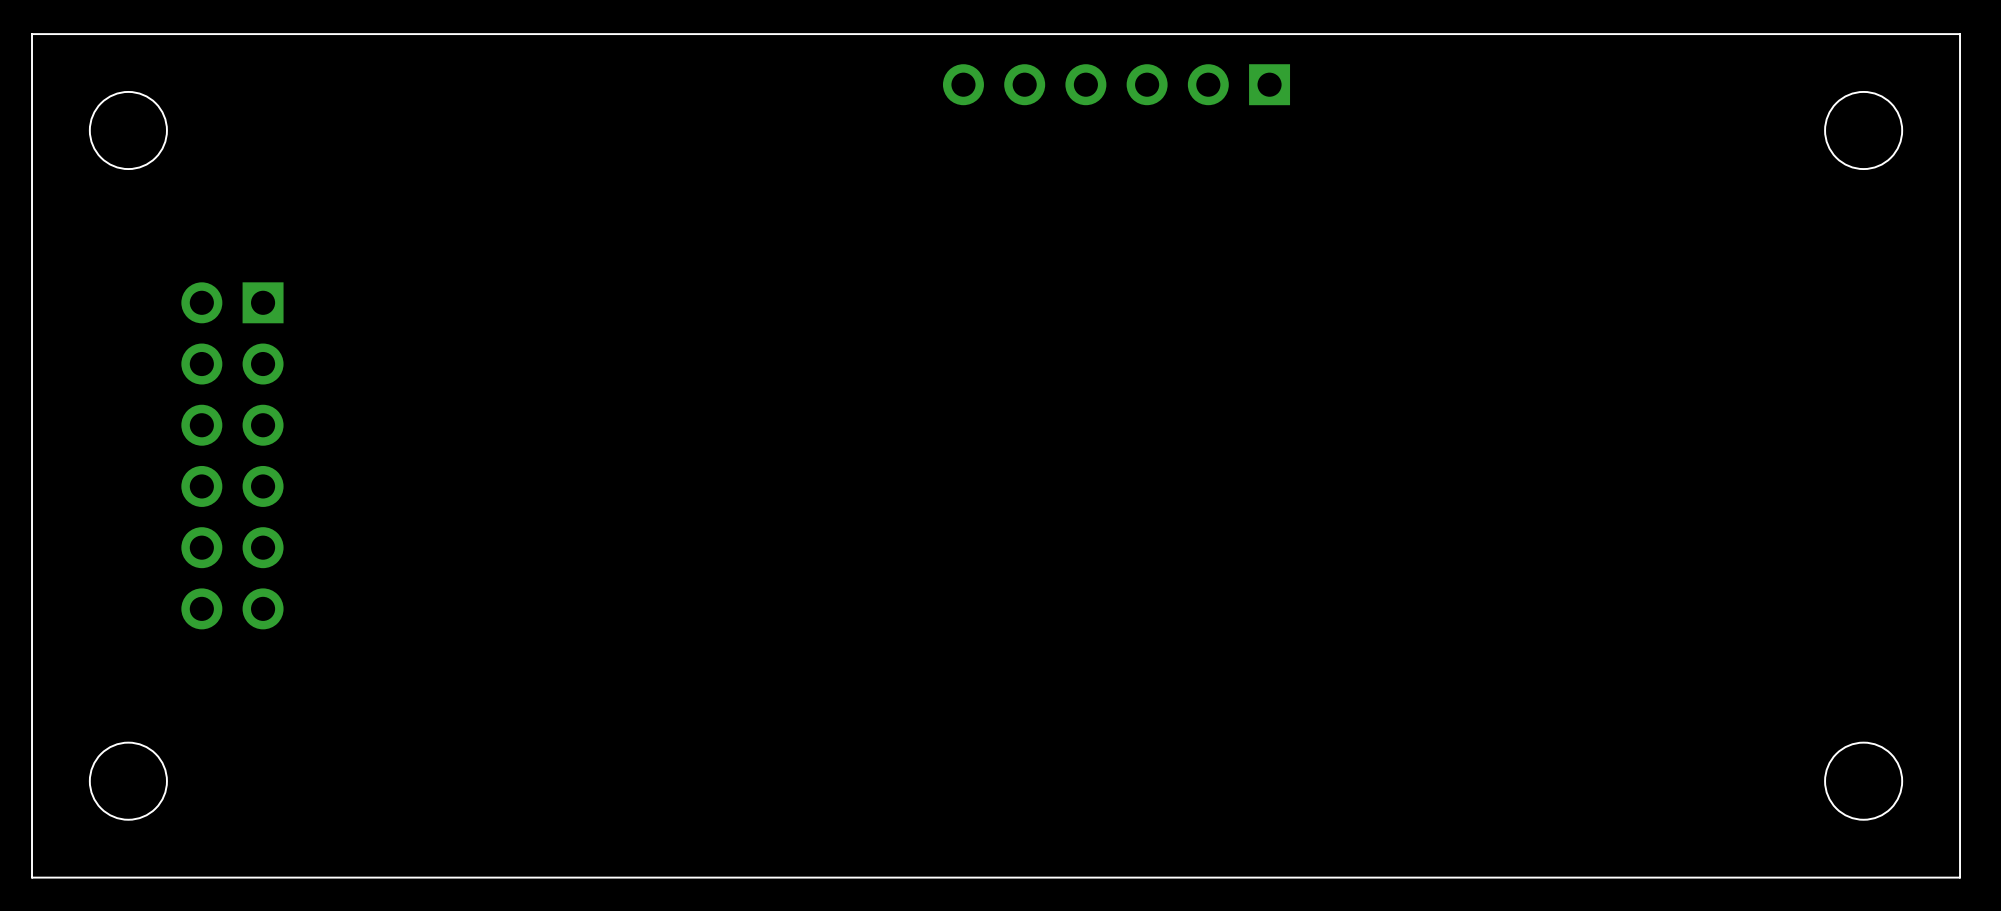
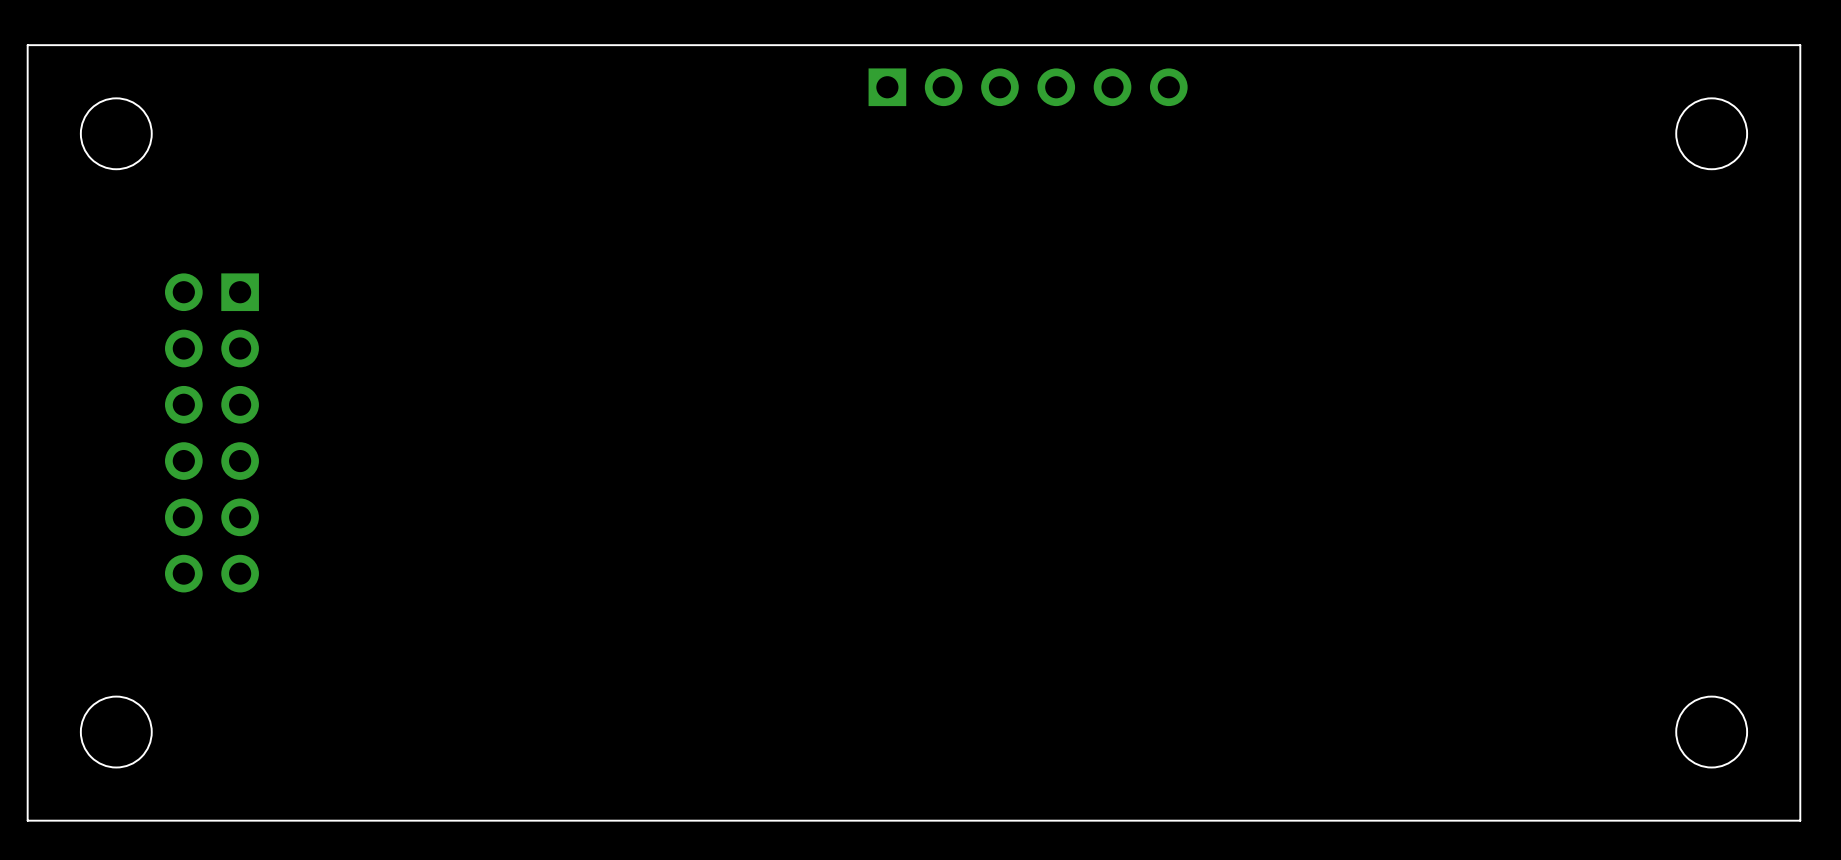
part rotation: 0° (1116, 84) -> 180° (1028, 87)

